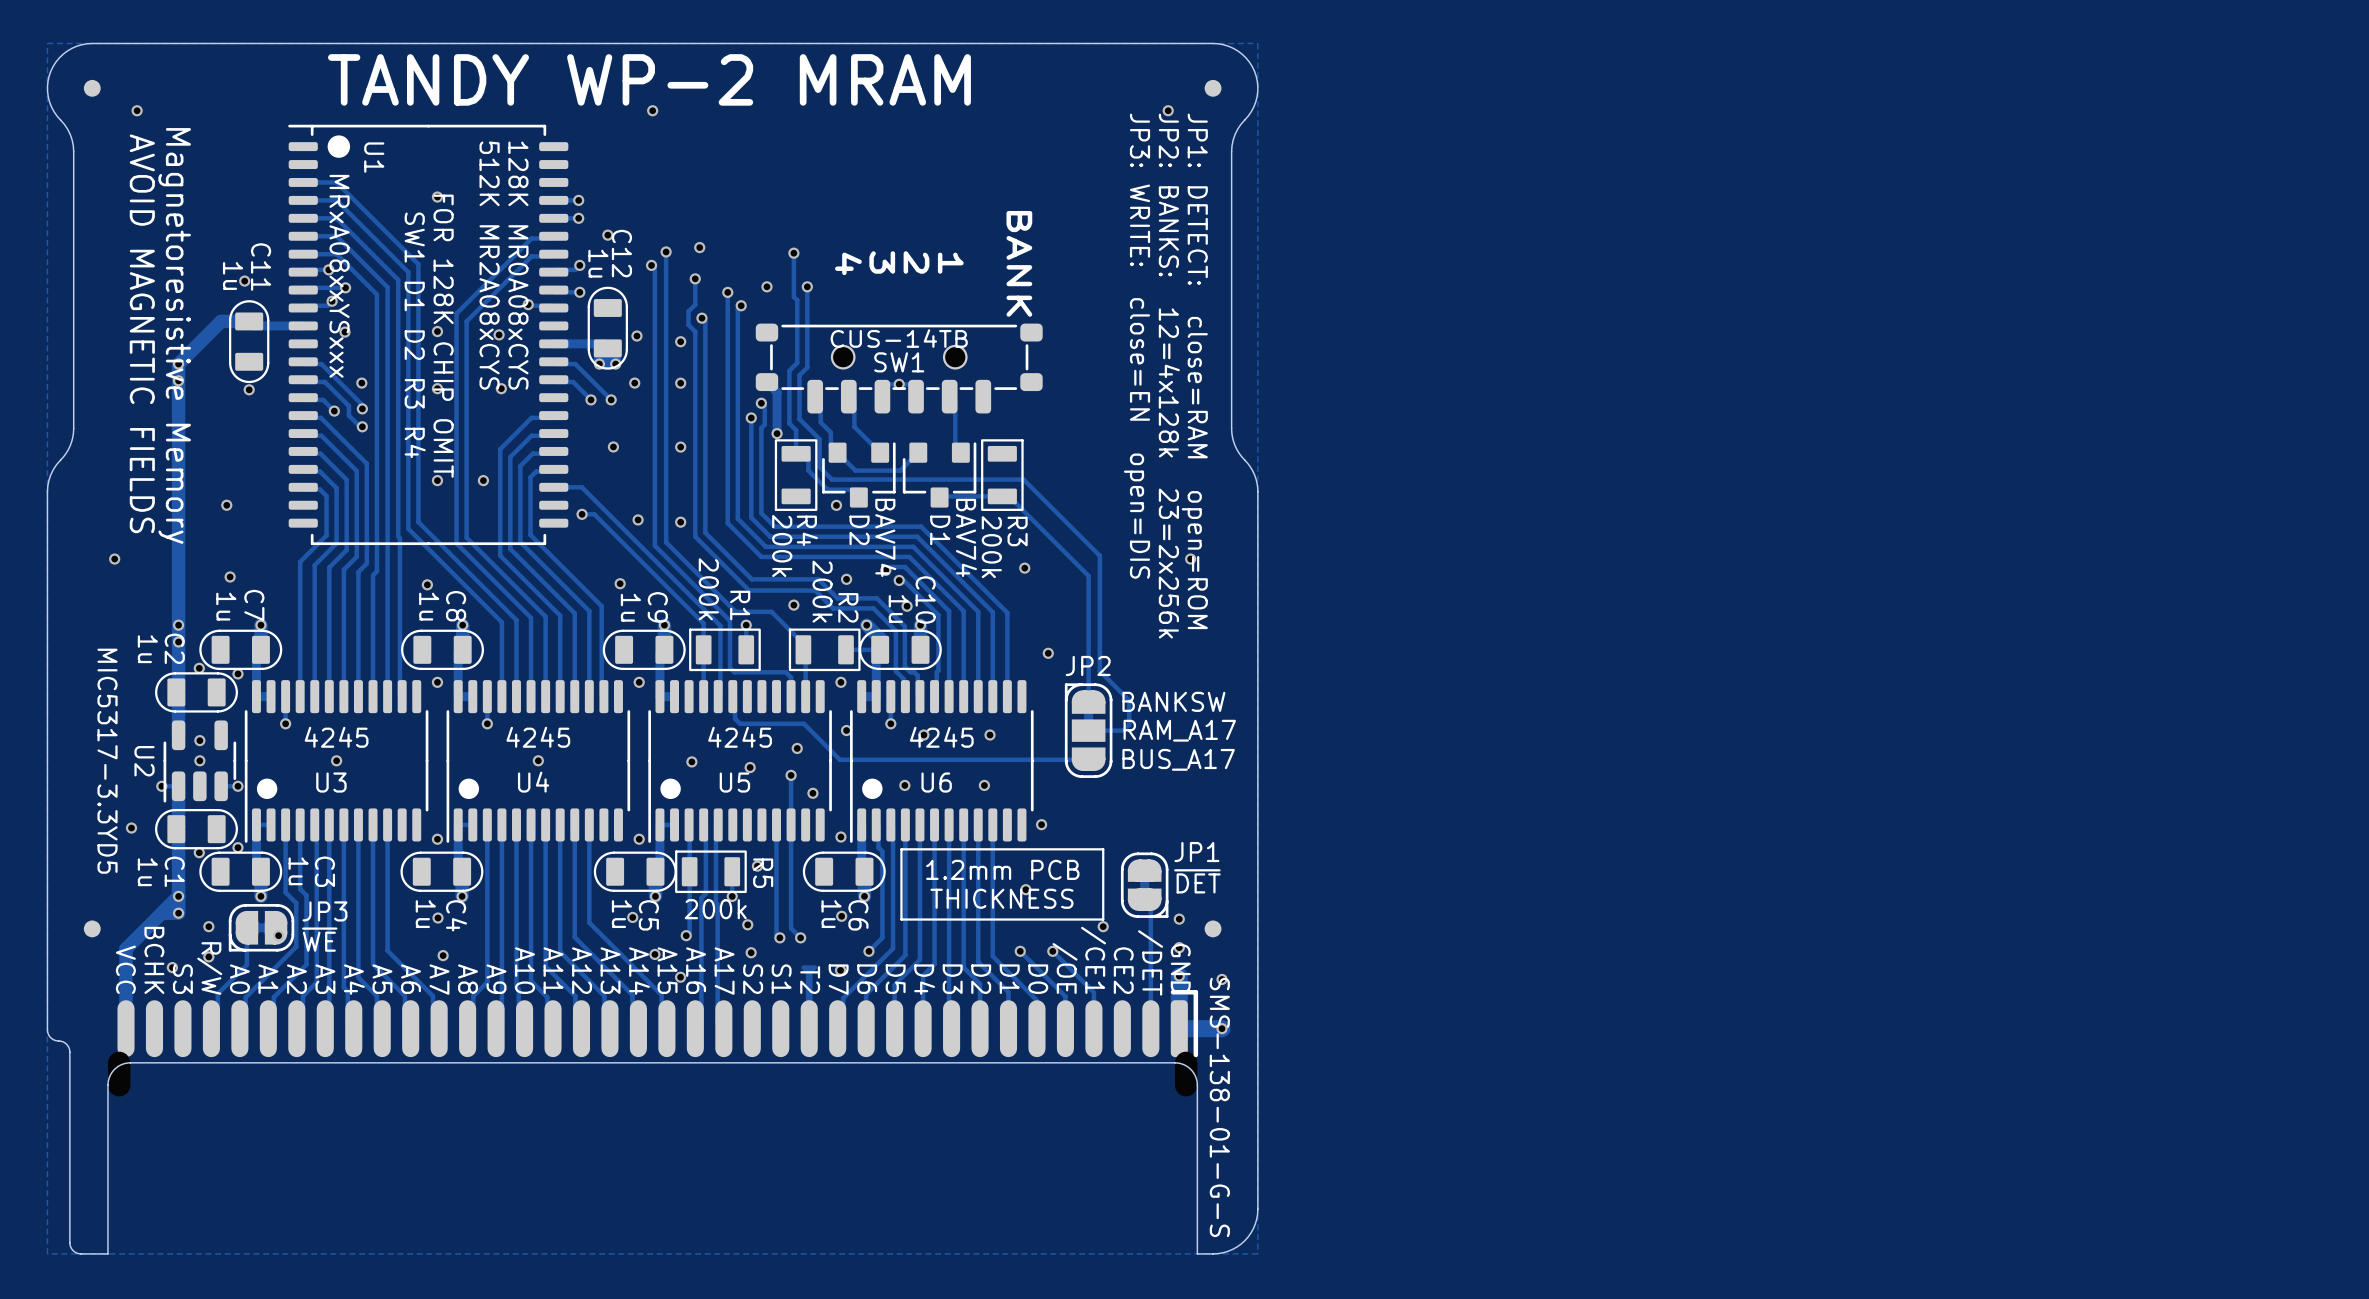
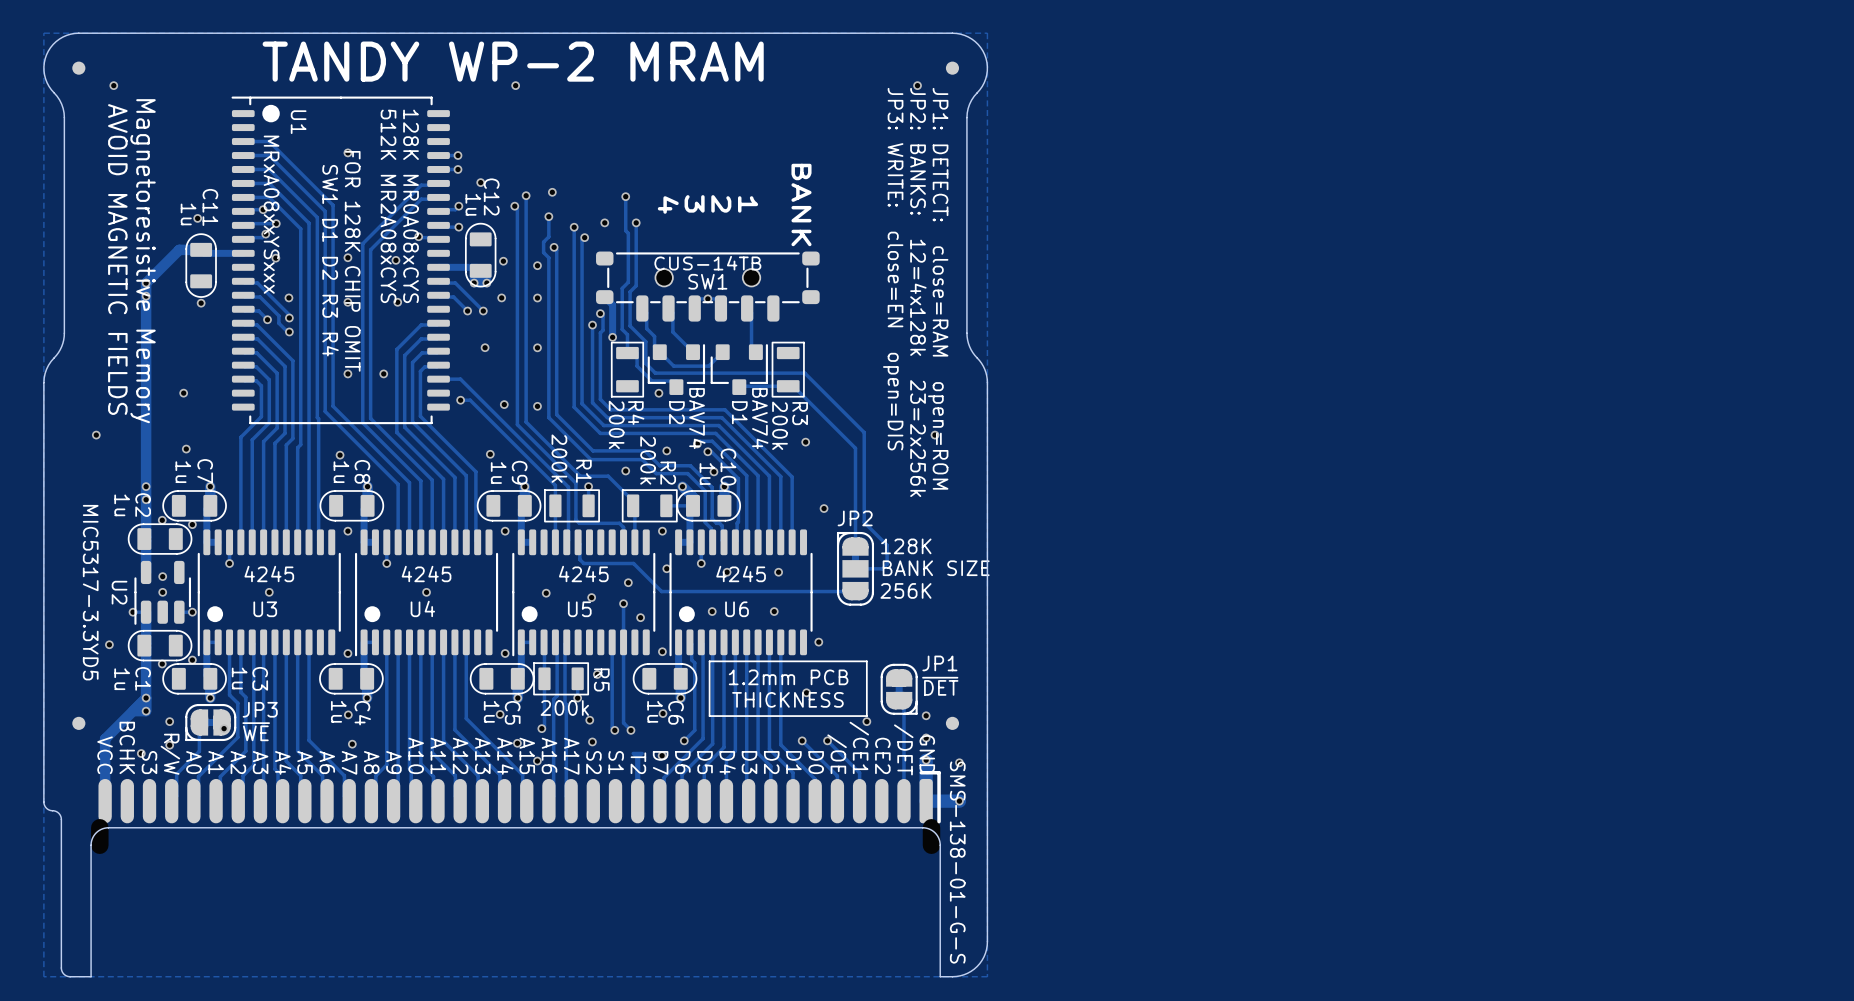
JP2 text: BANKSW (1173, 701) -> 128K (906, 546)
JP2 value: RAM_A17 (1179, 730) -> BANK SIZE (936, 568)
JP2 text: BUS_A17 (1178, 759) -> 256K (905, 590)

